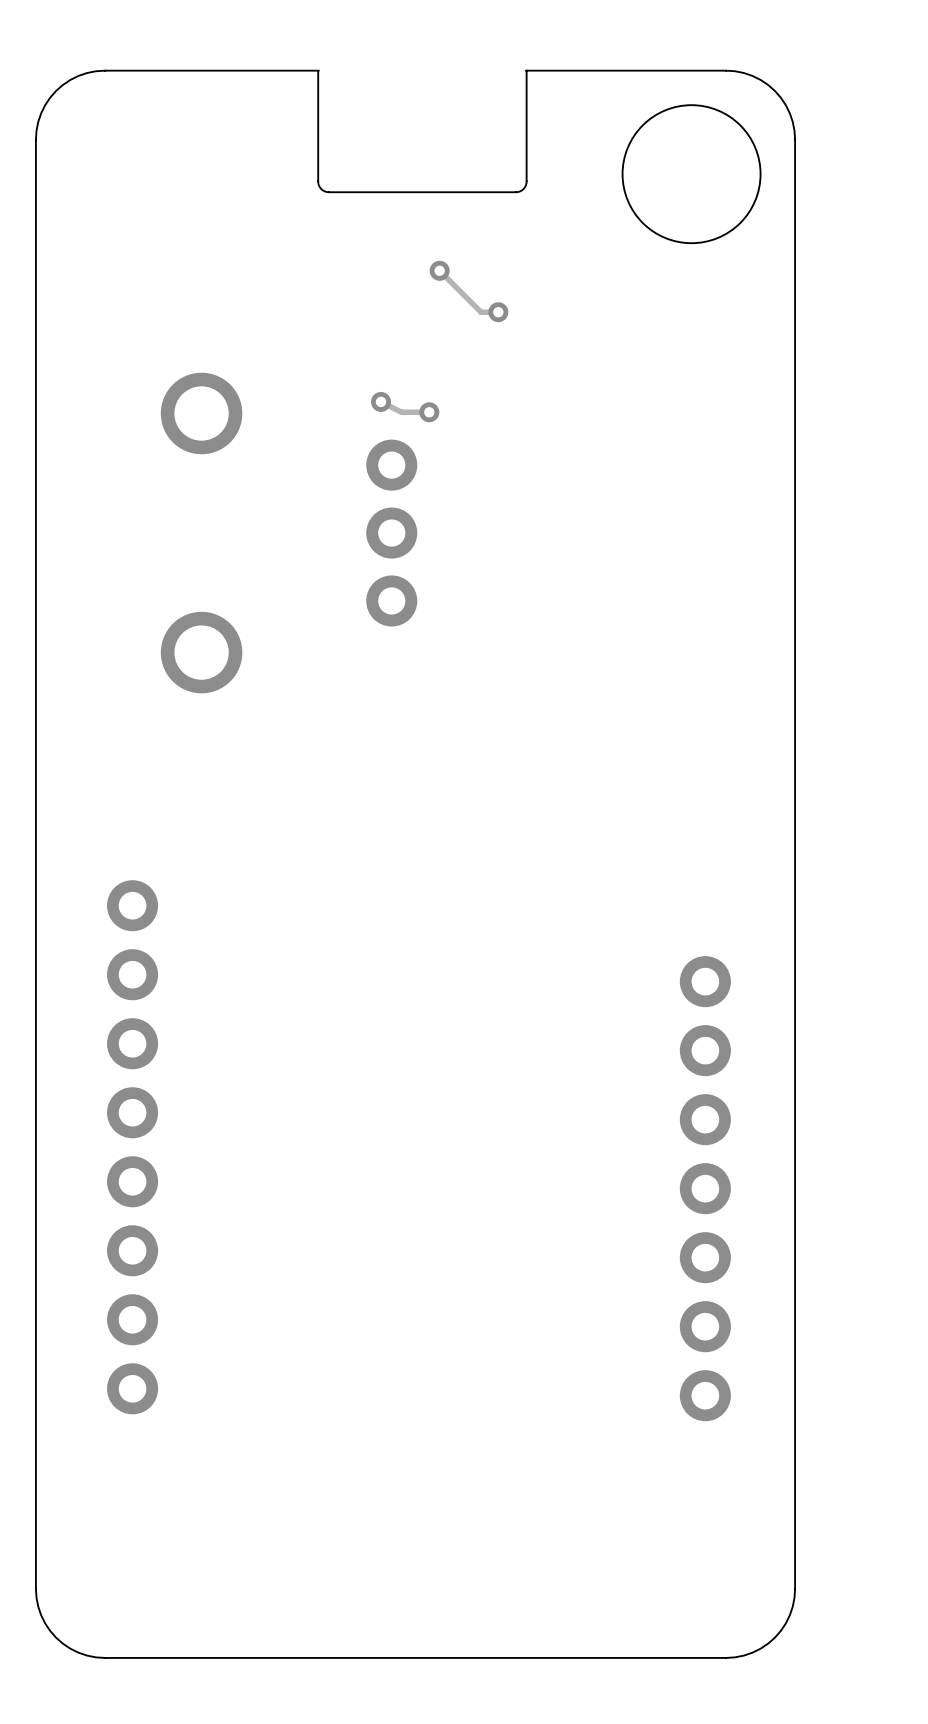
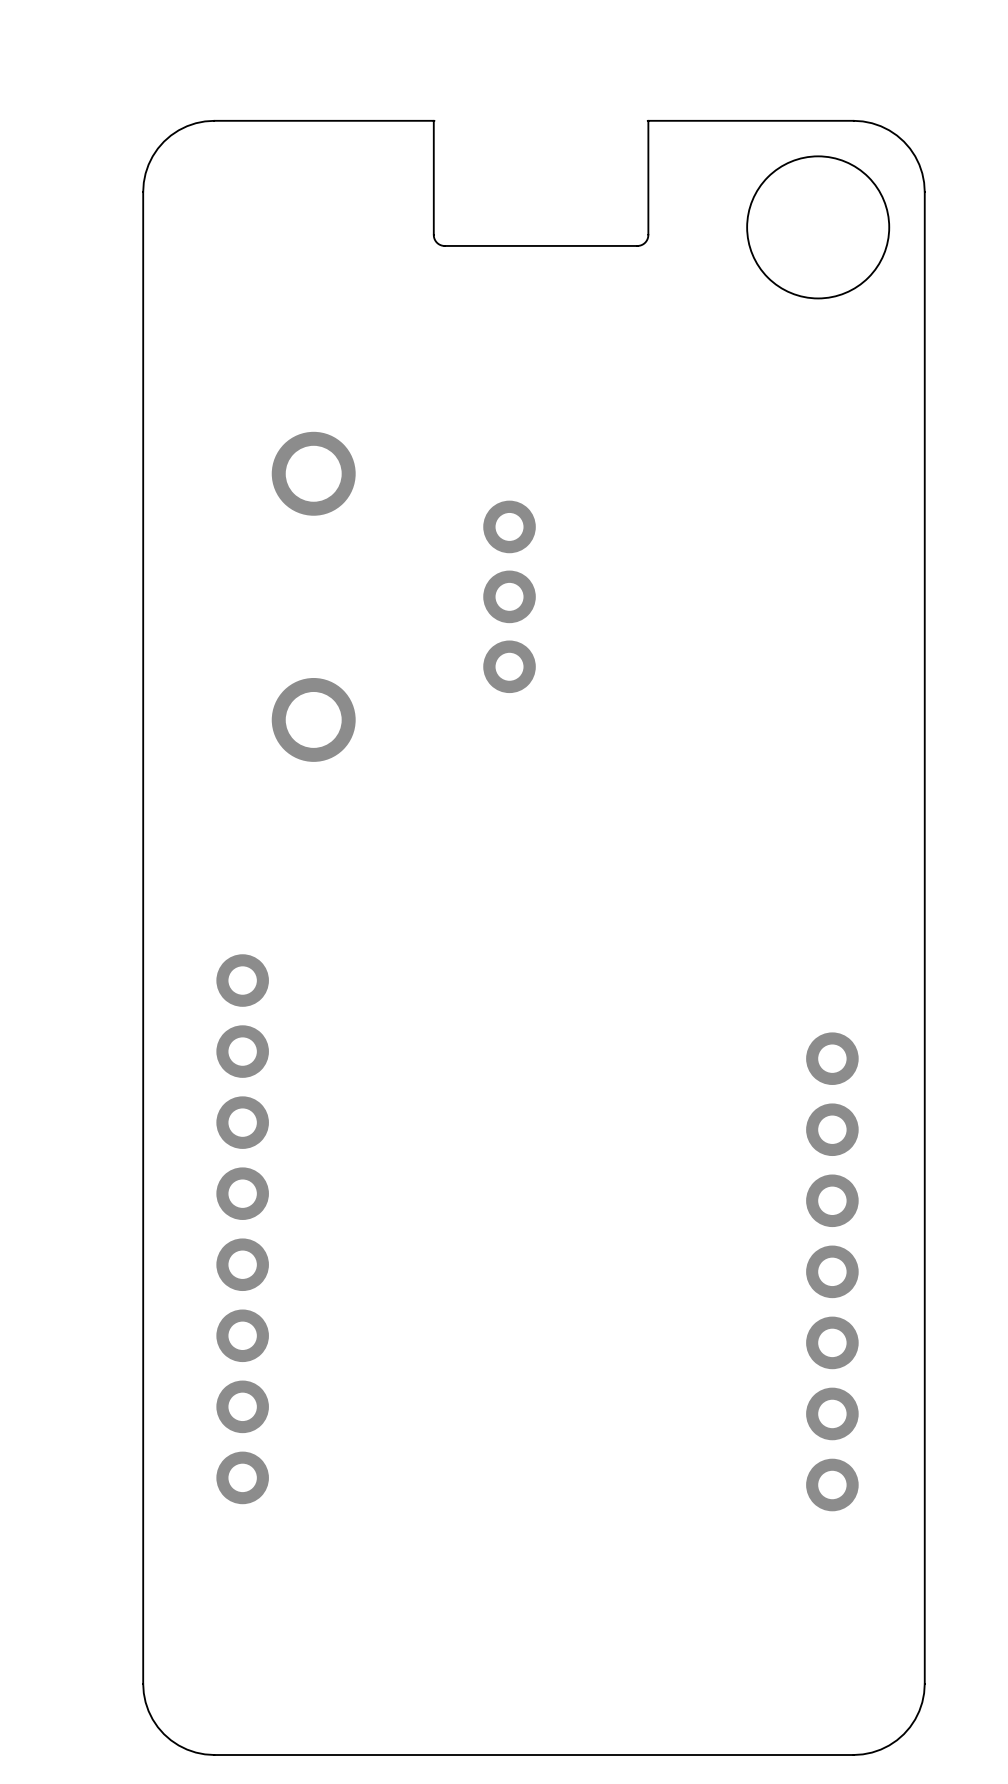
track: (439, 270) (481, 312) (498, 312) -> none
via: (439, 270) -> none
via: (498, 312) -> none
track: (381, 401) (401, 412) (429, 412) -> none
via: (381, 401) -> none
via: (429, 412) -> none

